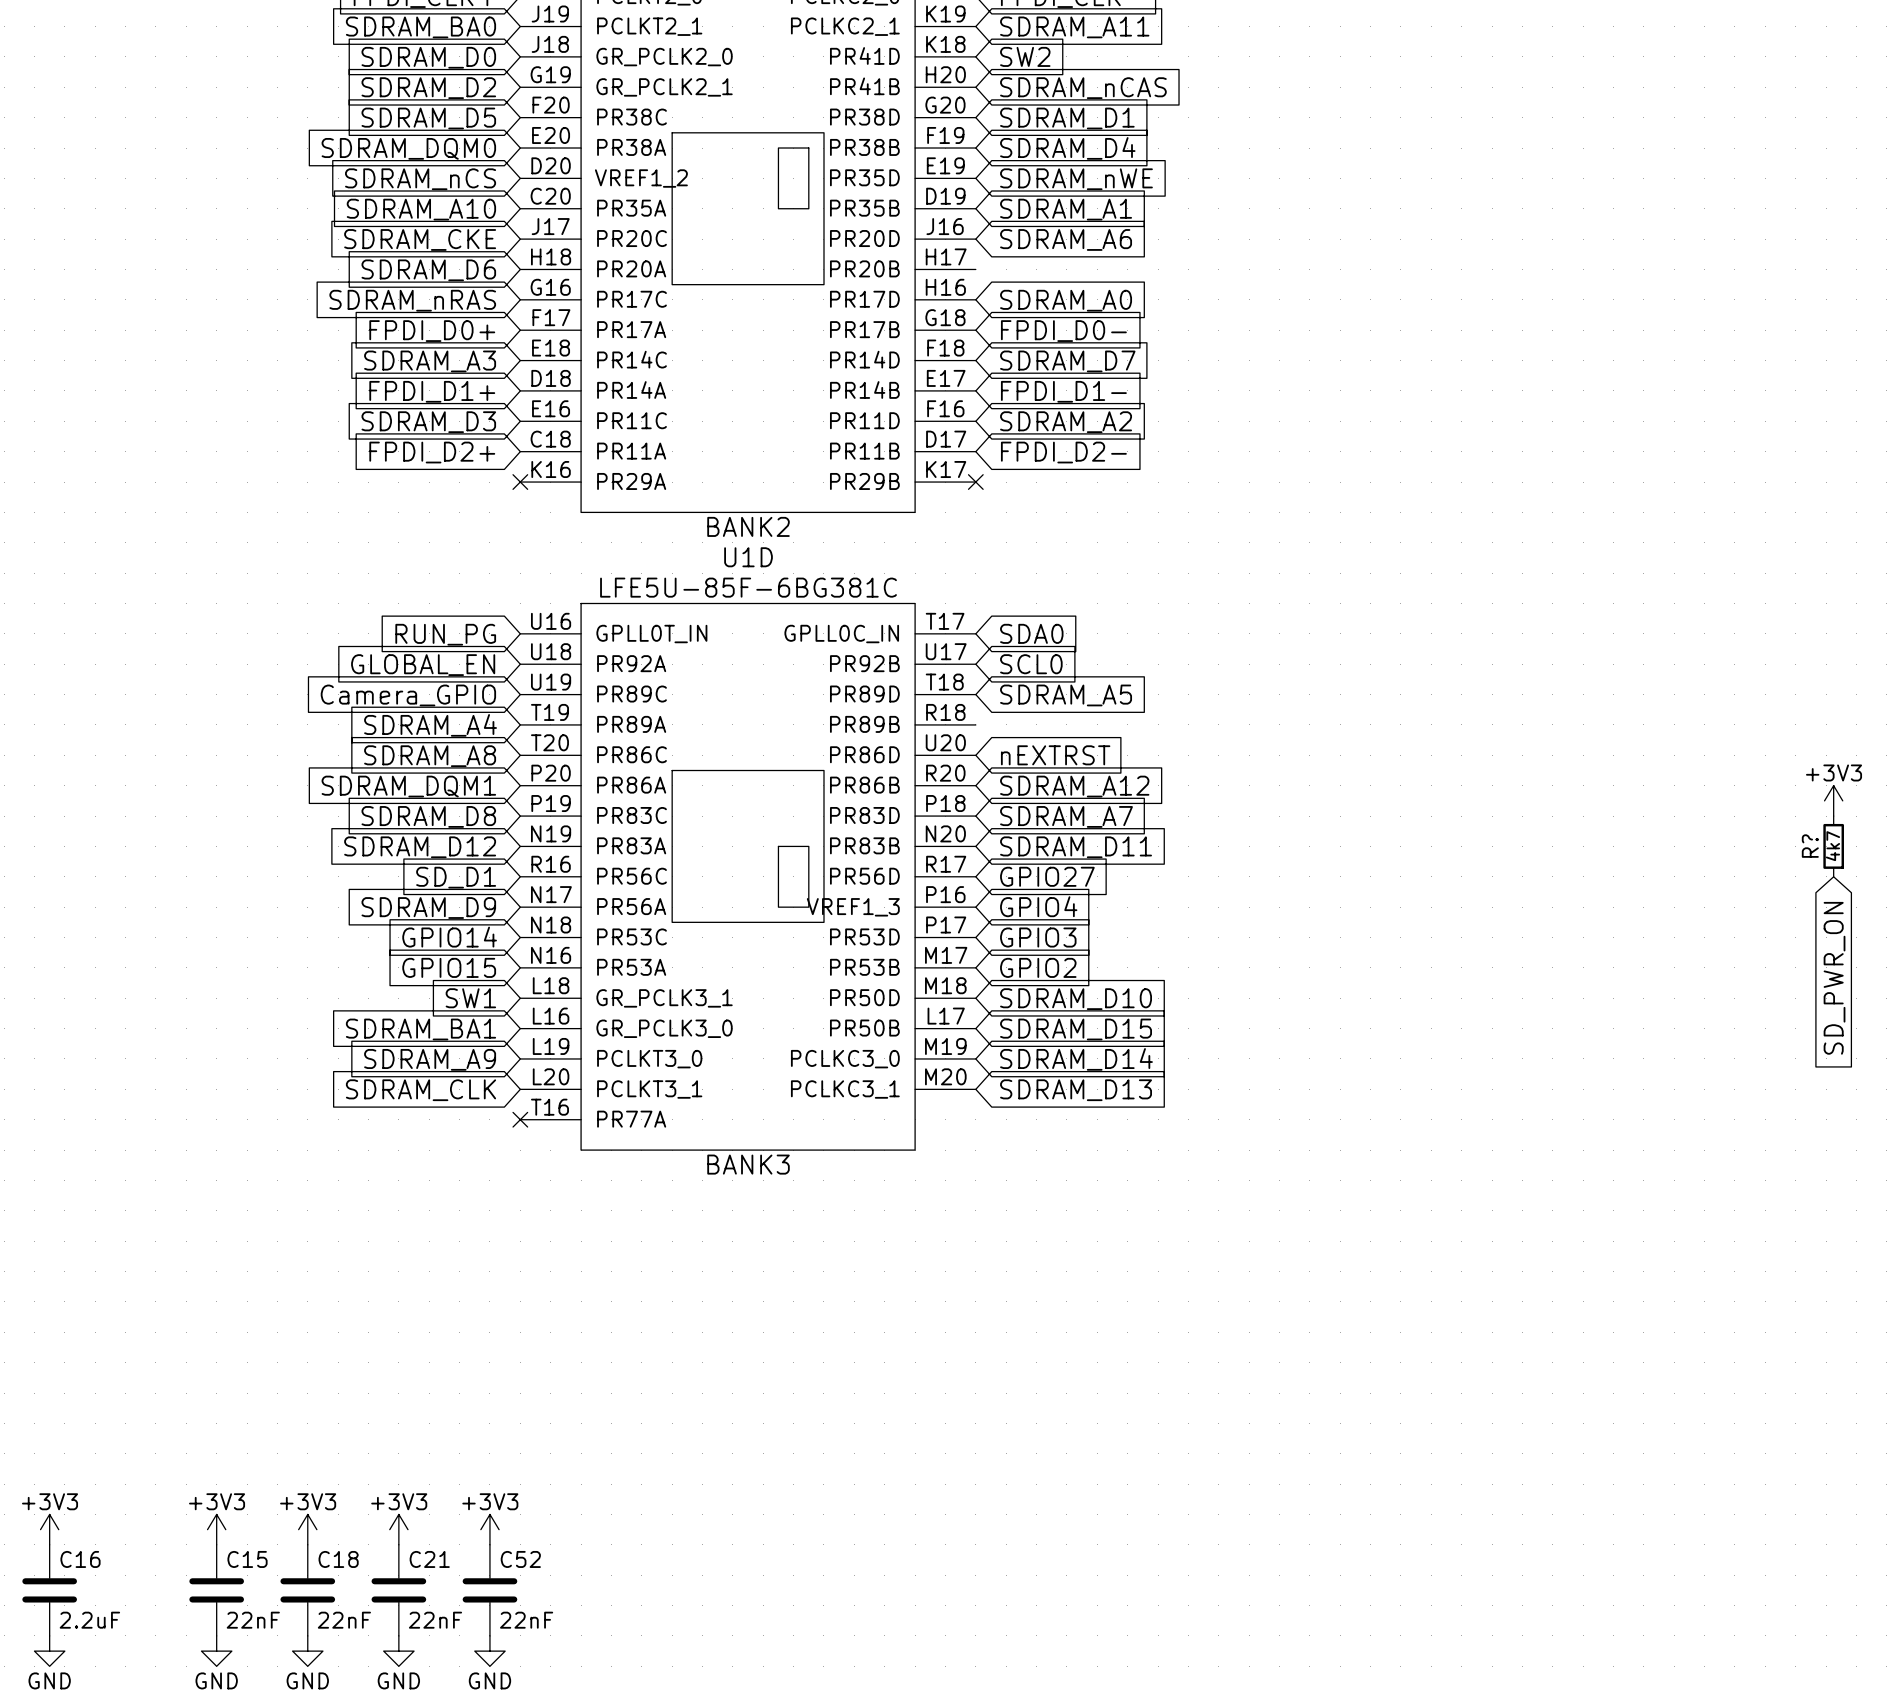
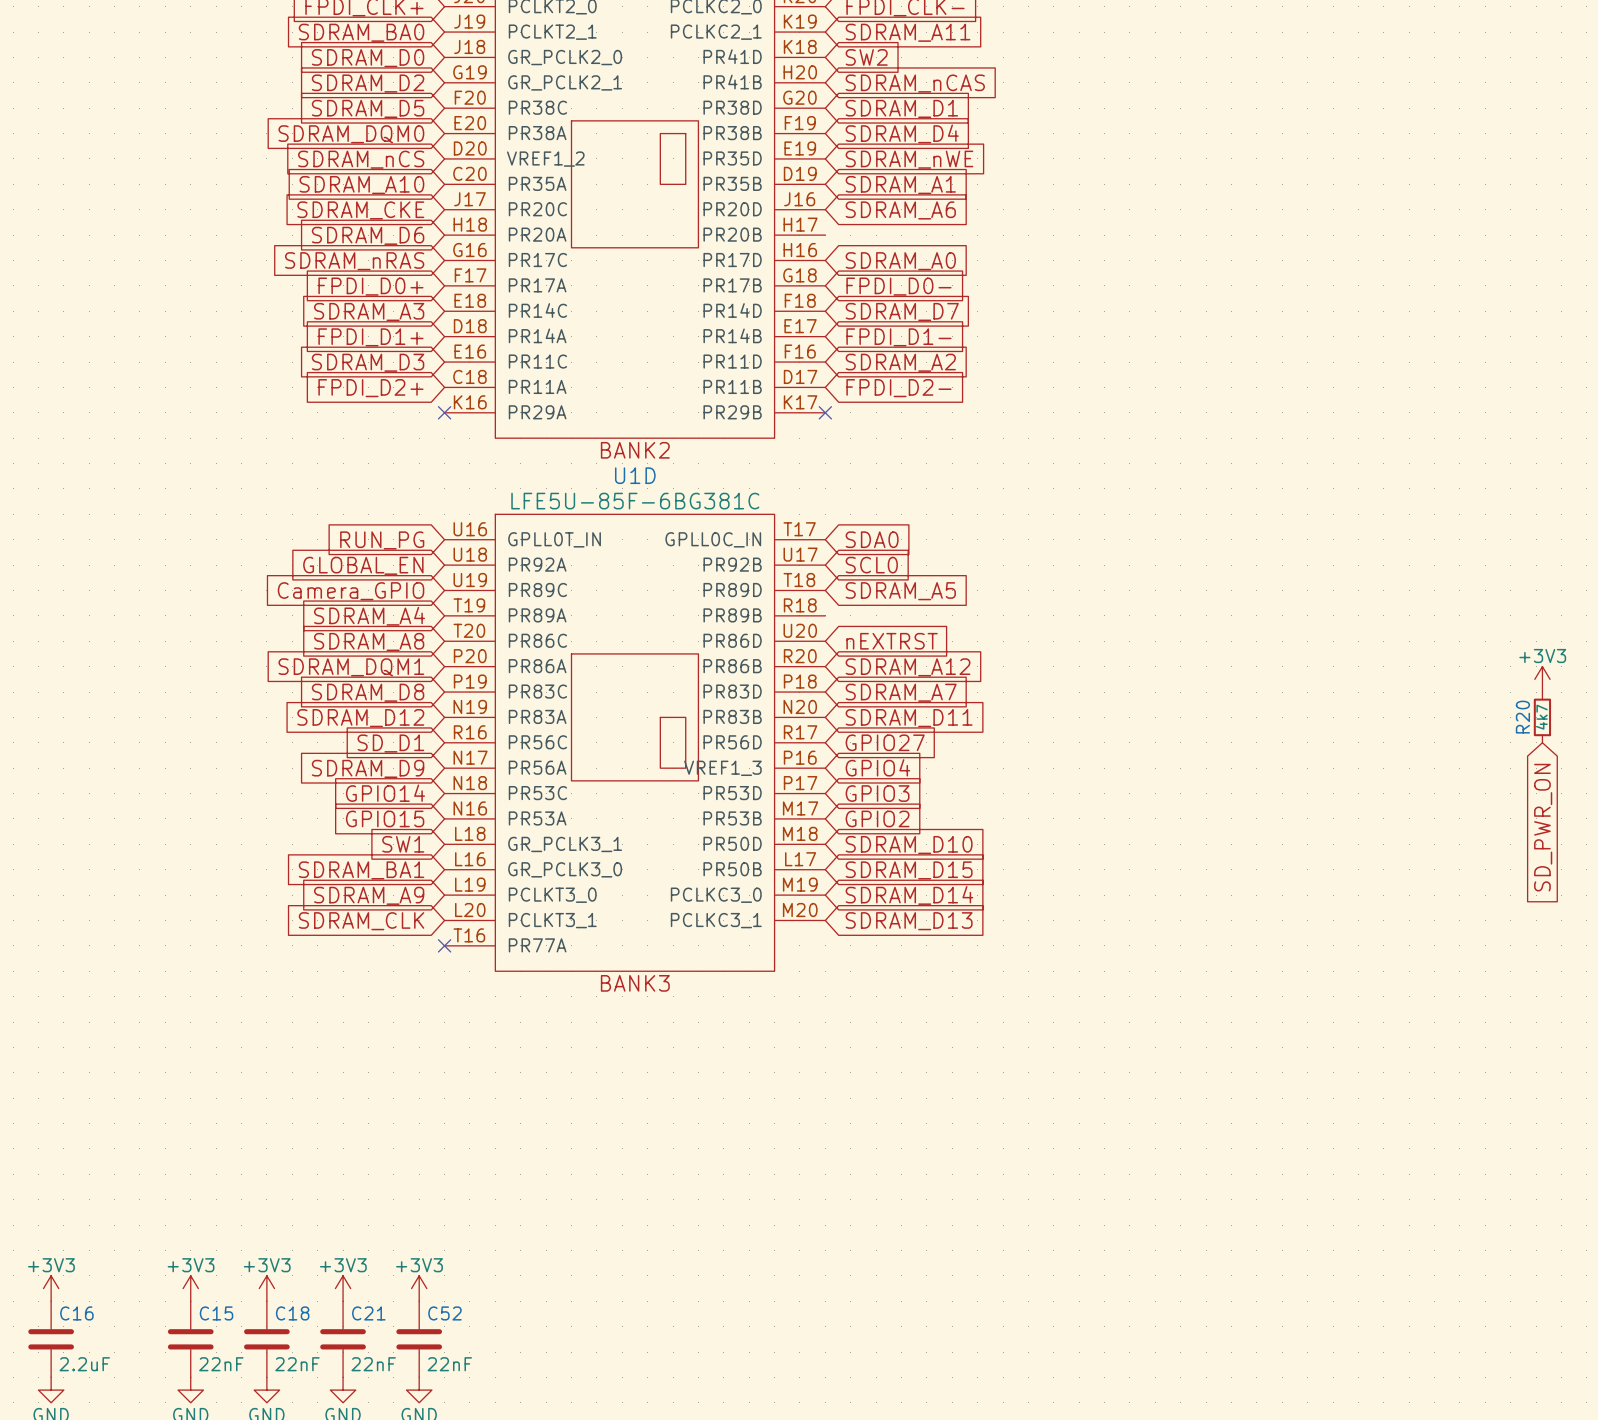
R? name: R? (1810, 846) -> R20 (1522, 717)

